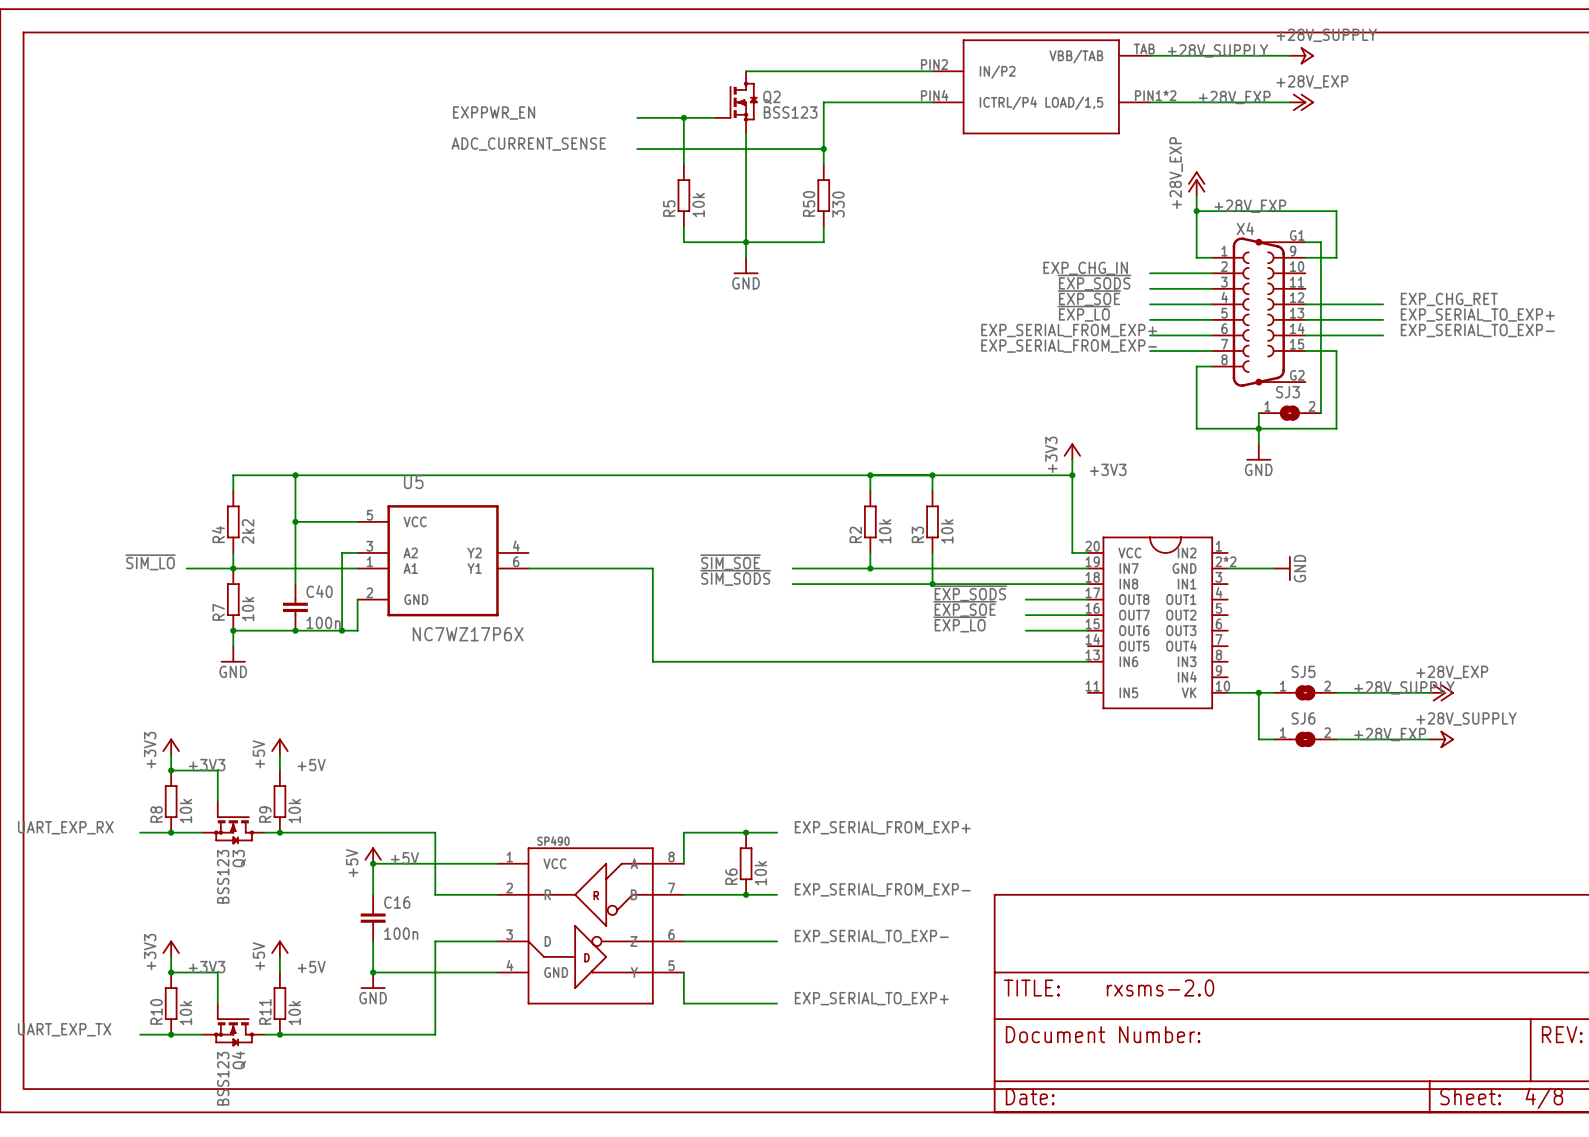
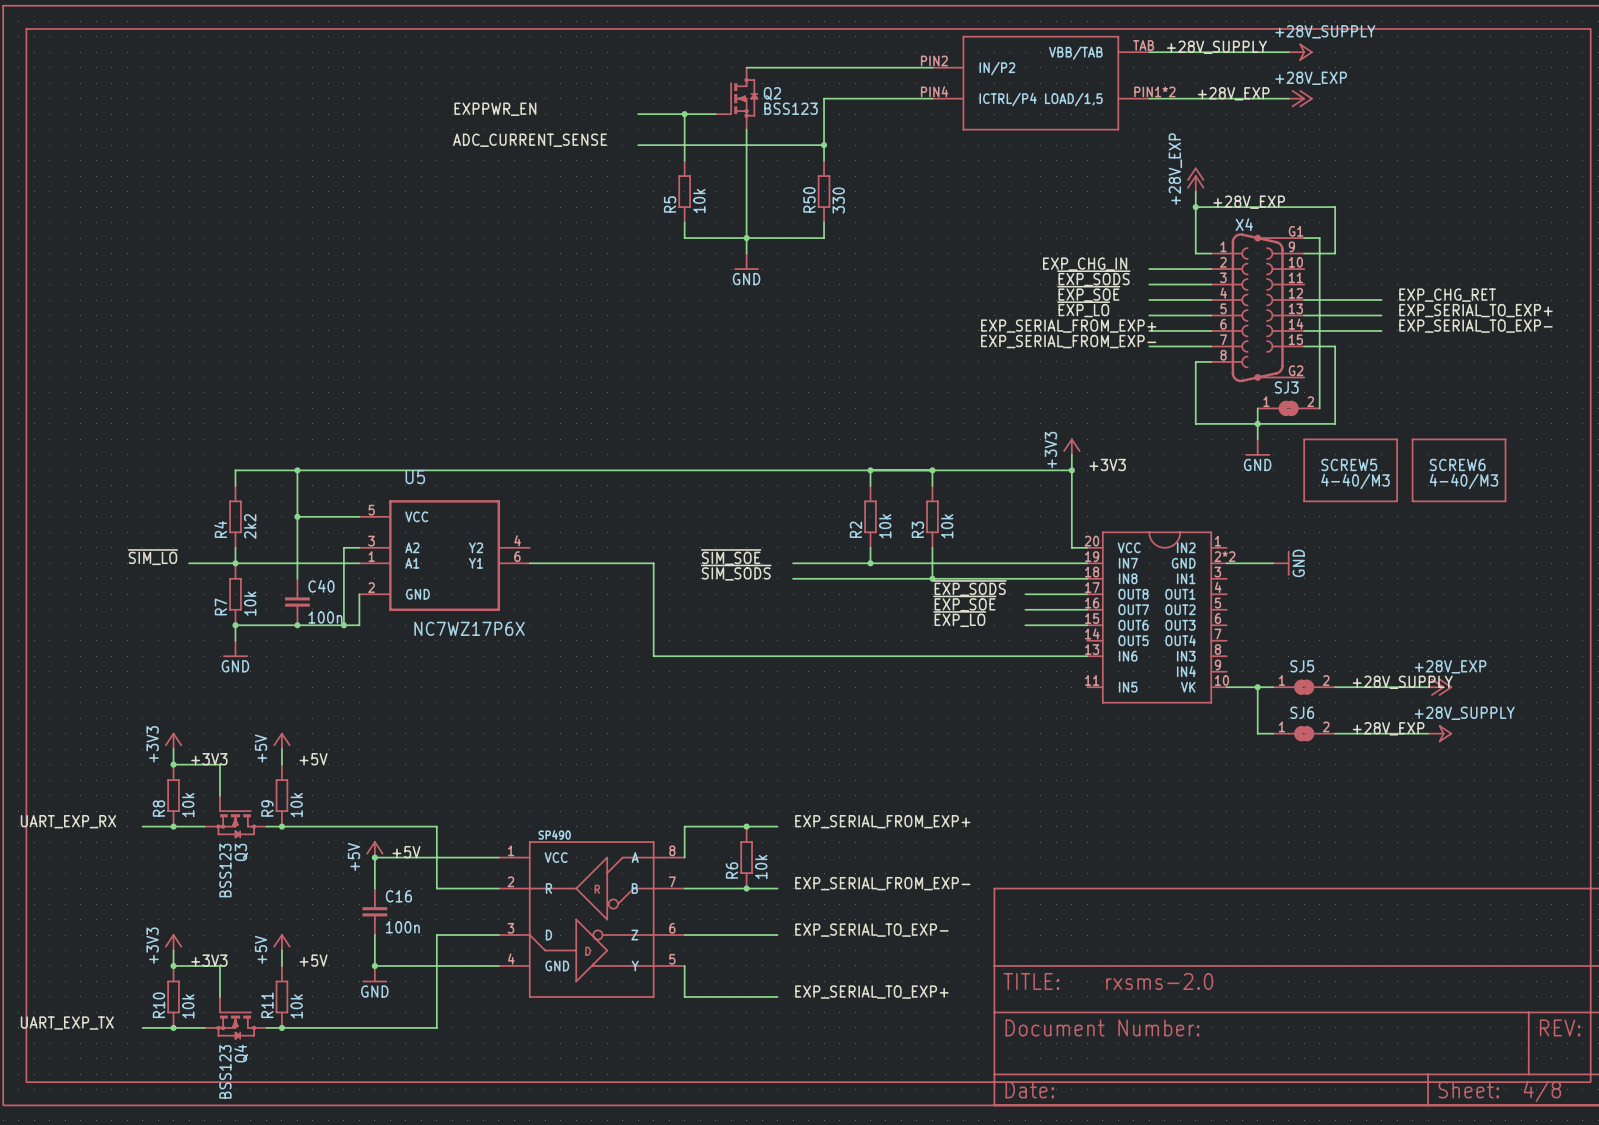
SCREW5: none -> 4-40/M3 (1350, 470)
SCREW6: none -> 4-40/M3 (1459, 470)

